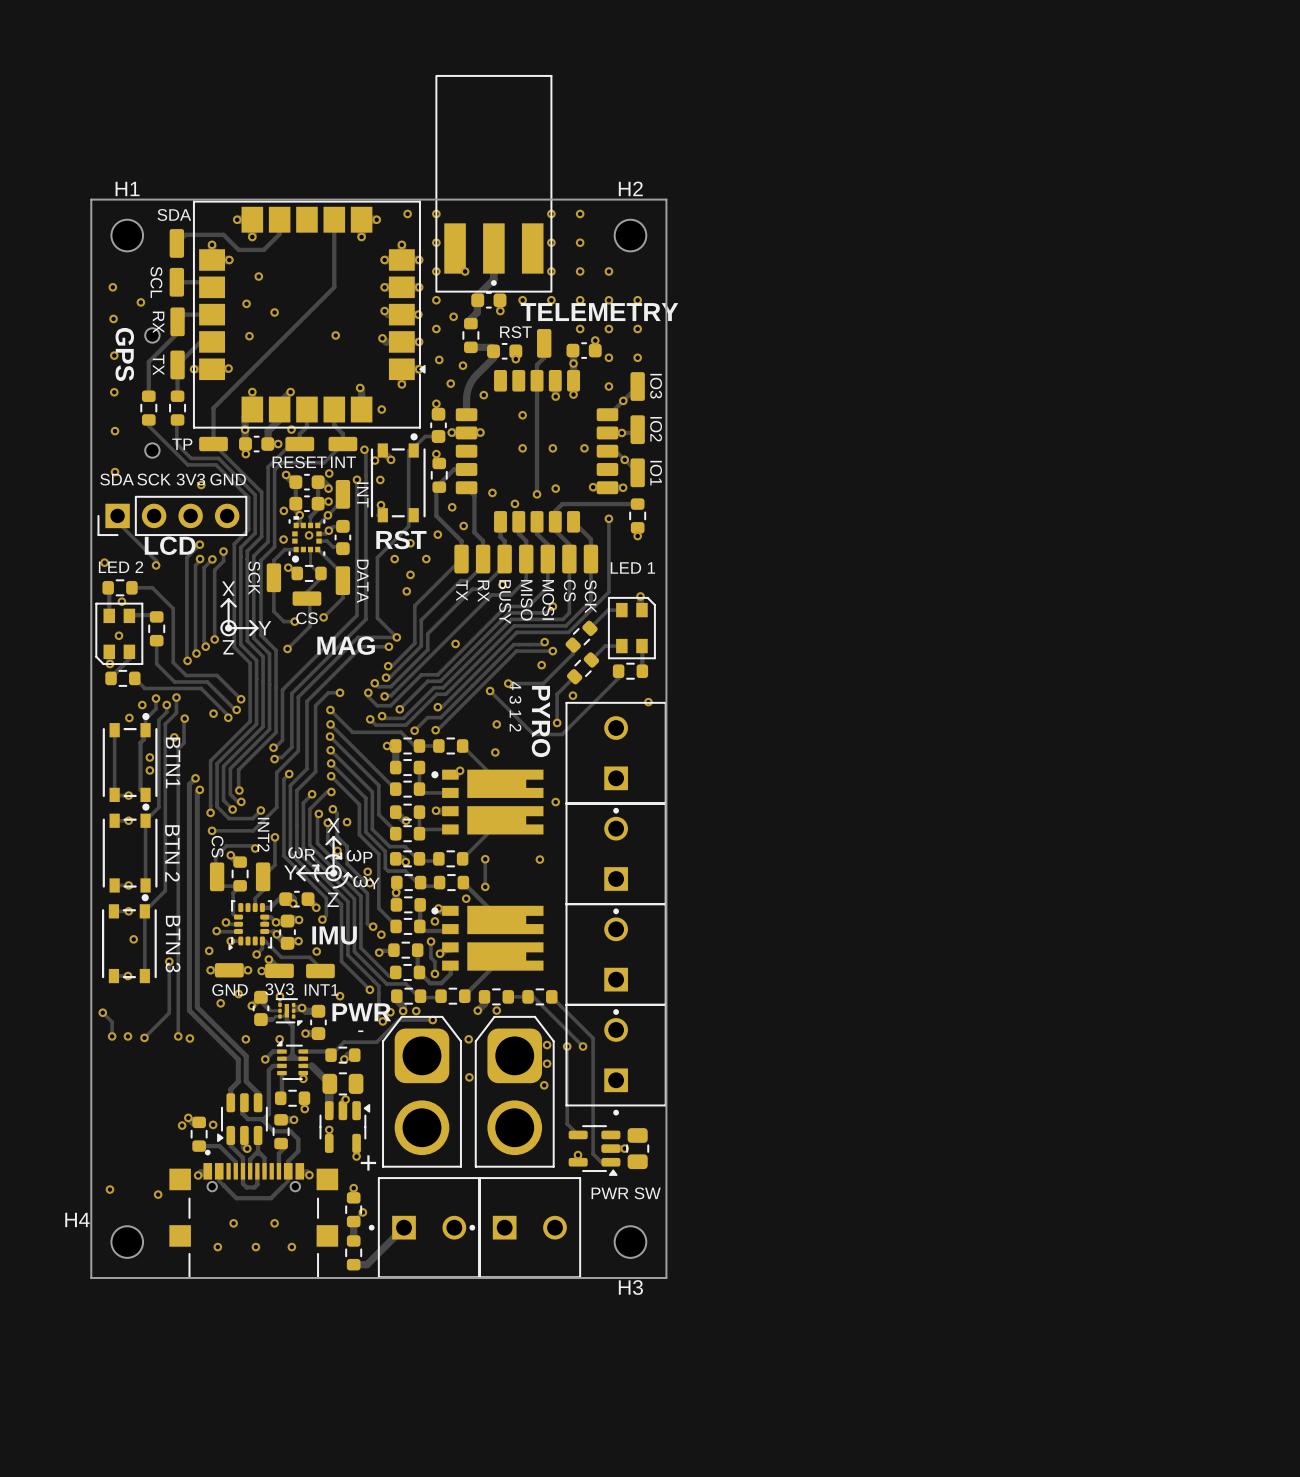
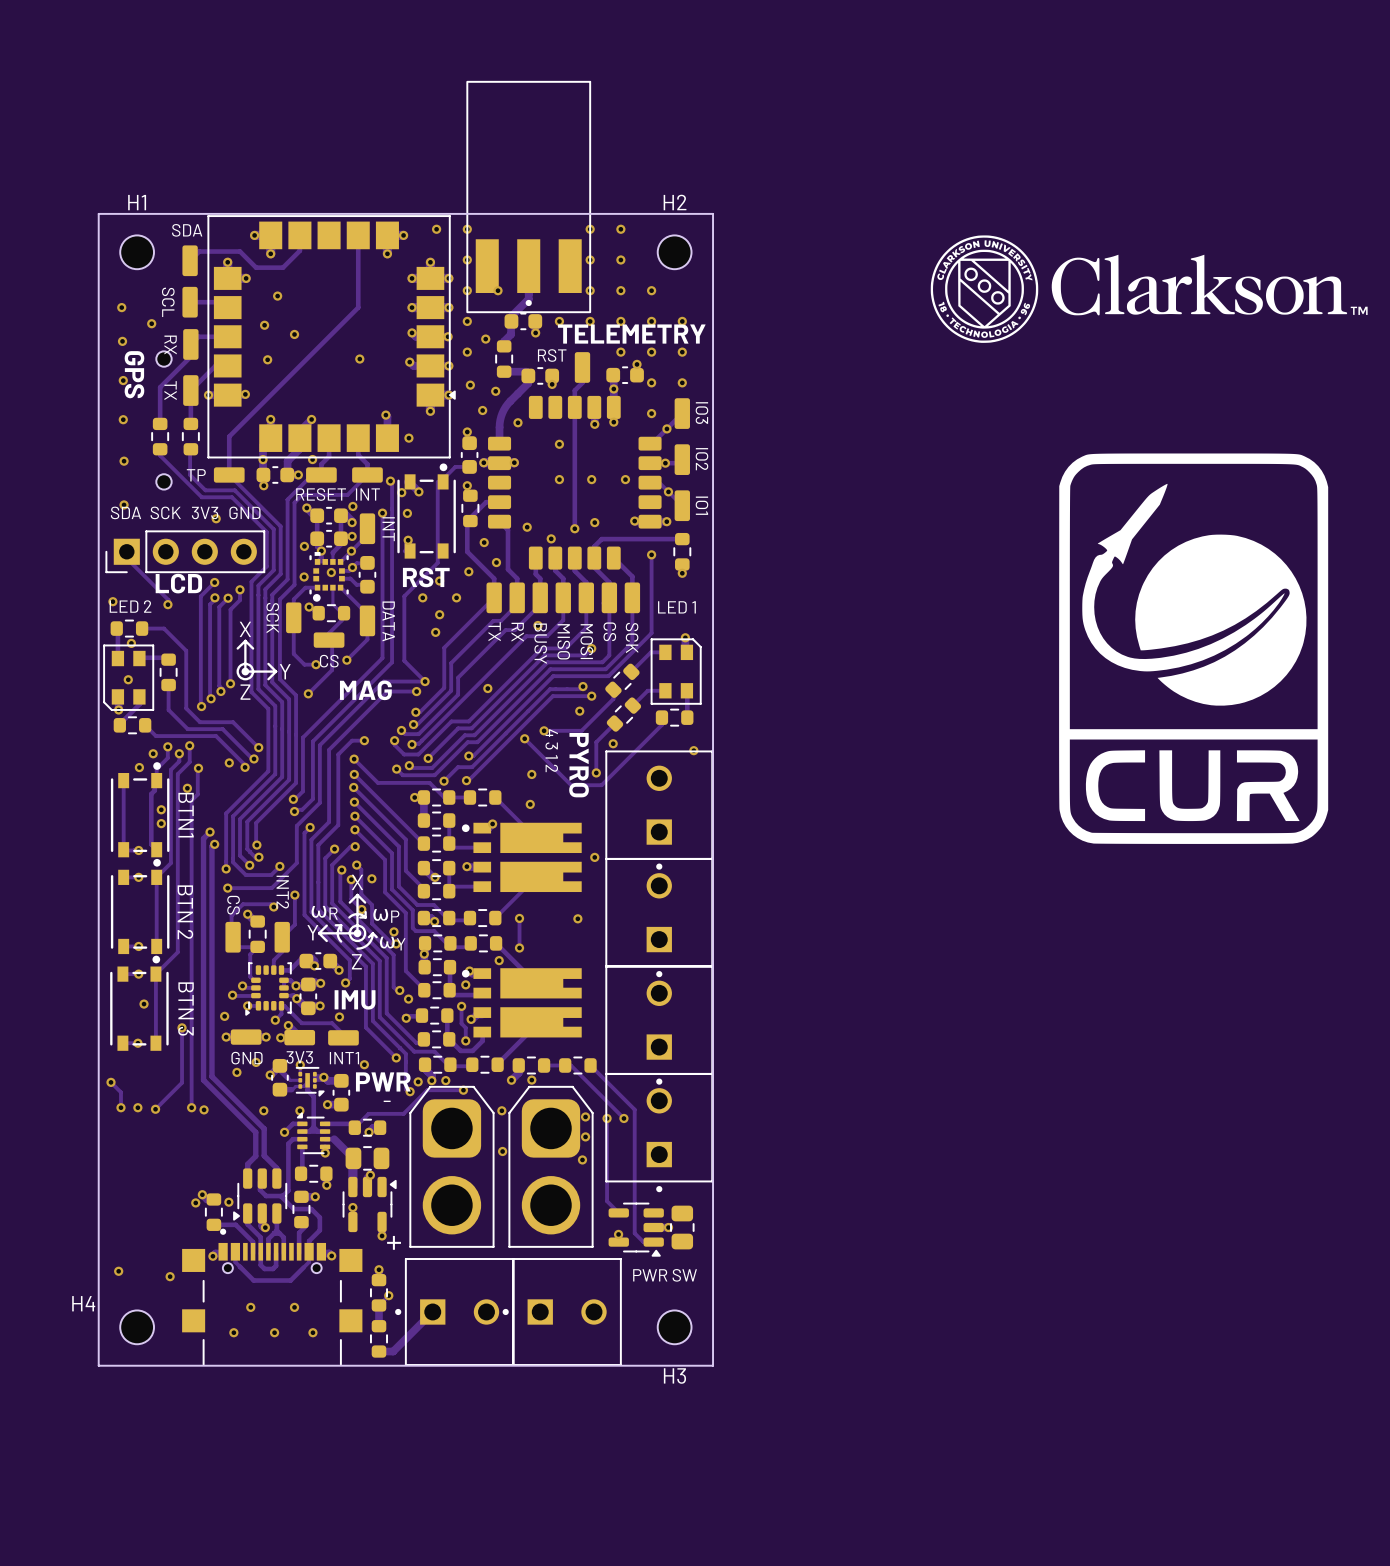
drawing: none -> [930, 235, 1368, 343]
drawing: none -> [1059, 453, 1329, 844]

